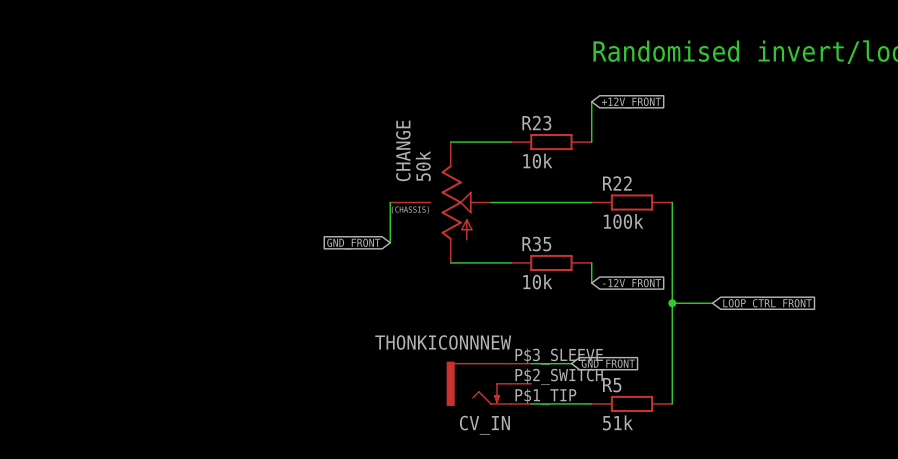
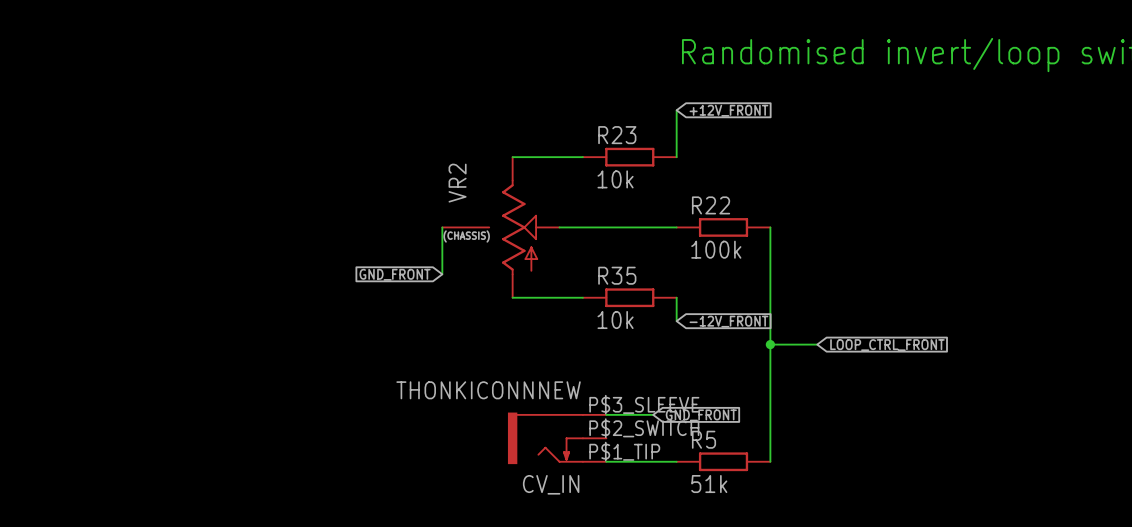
CHANGE name: CHANGE (403, 150) -> VR2 (457, 183)
CHANGE value: 50k (423, 166) -> none

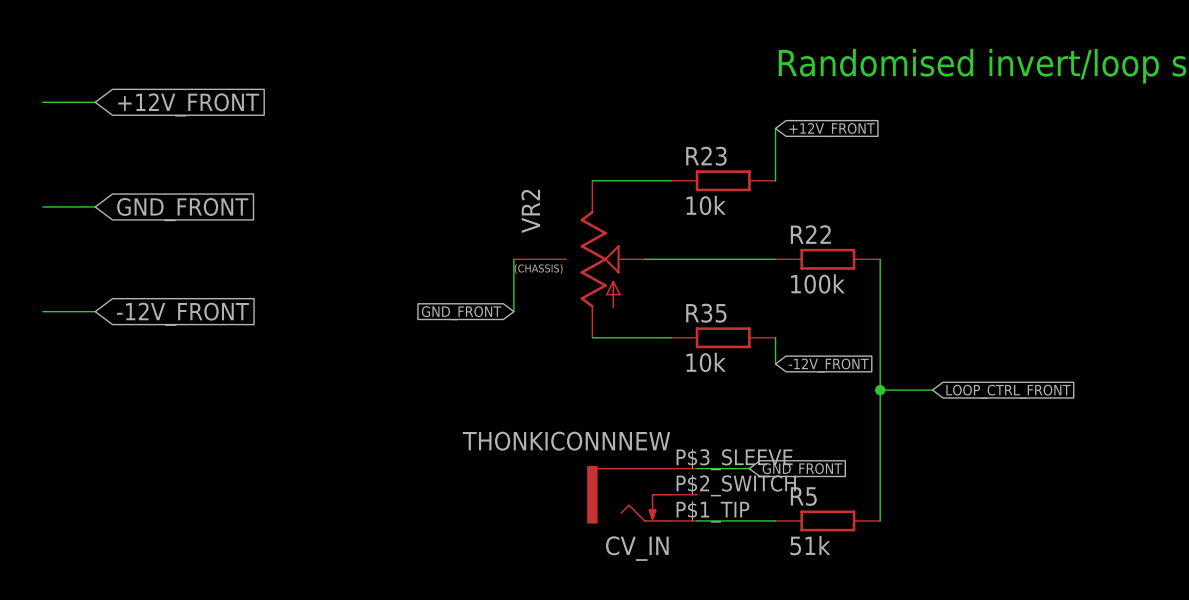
wire: none -> (42, 102) (95, 102)
global label: none -> +12V_FRONT (188, 104)
wire: none -> (42, 206) (95, 206)
global label: none -> GND_FRONT (182, 209)
wire: none -> (42, 311) (95, 311)
global label: none -> -12V_FRONT (182, 314)

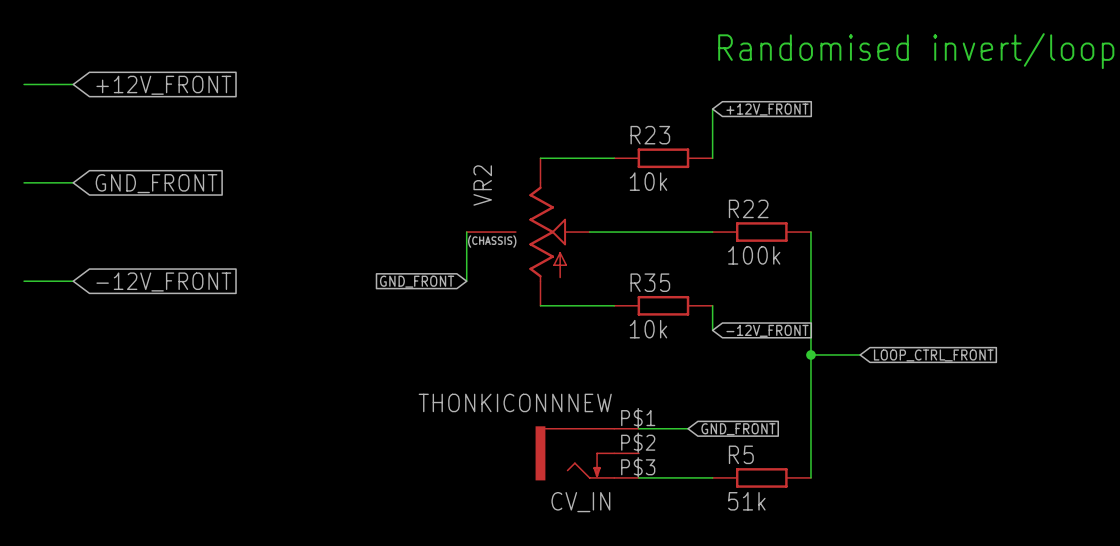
CV_IN pin number: P$3_SLEEVE (734, 459) -> P$1 (638, 418)
CV_IN pin number: P$2_SWITCH (736, 485) -> P$2 (638, 442)
CV_IN pin number: P$1_TIP (712, 511) -> P$3 (638, 467)

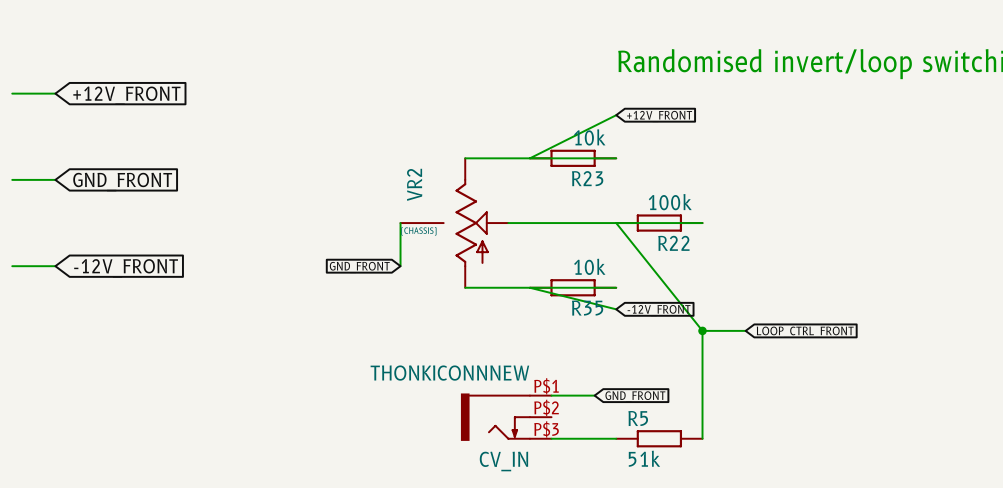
wire: (712, 109) (712, 158) -> (616, 115) (529, 158) (616, 158)
R23 name position: R23 (650, 135) -> R23 (587, 178)
R23 value position: 10k (648, 181) -> 10k (589, 137)
R22 name position: R22 (748, 208) -> R22 (673, 243)
wire: (810, 232) (810, 354) -> (702, 223) (616, 223) (702, 330)
R22 value position: 100k (754, 255) -> 100k (670, 202)
R35 name position: R35 (650, 282) -> R35 (587, 308)
wire: (712, 305) (712, 330) -> (616, 287) (529, 287) (616, 309)
R35 value position: 10k (648, 329) -> 10k (589, 266)

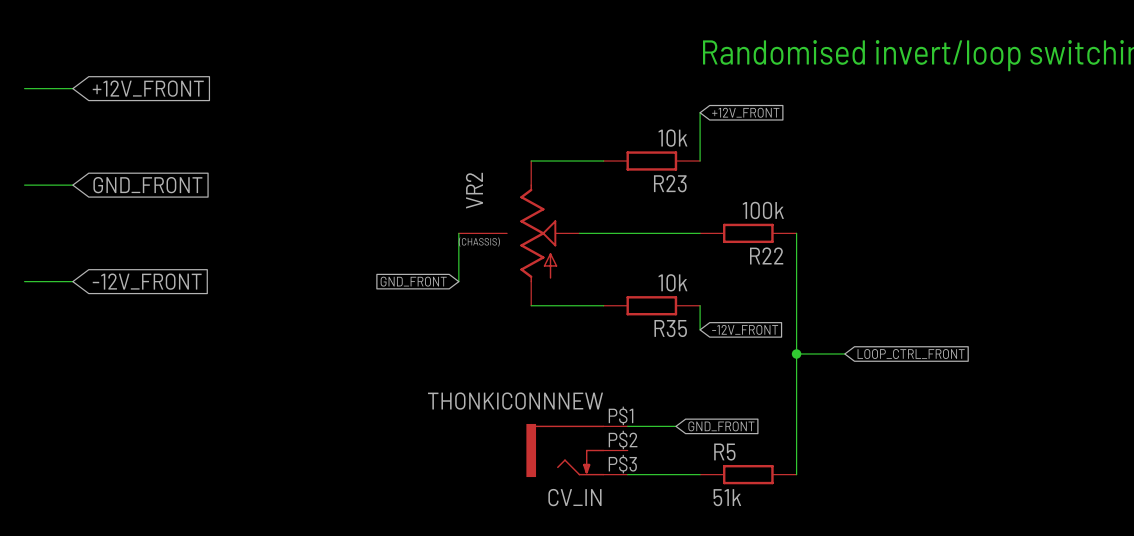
wire: (616, 115) (529, 158) (616, 158) -> (700, 112) (700, 161)
wire: (702, 223) (616, 223) (702, 330) -> (796, 233) (796, 354)
wire: (616, 287) (529, 287) (616, 309) -> (700, 305) (700, 329)

